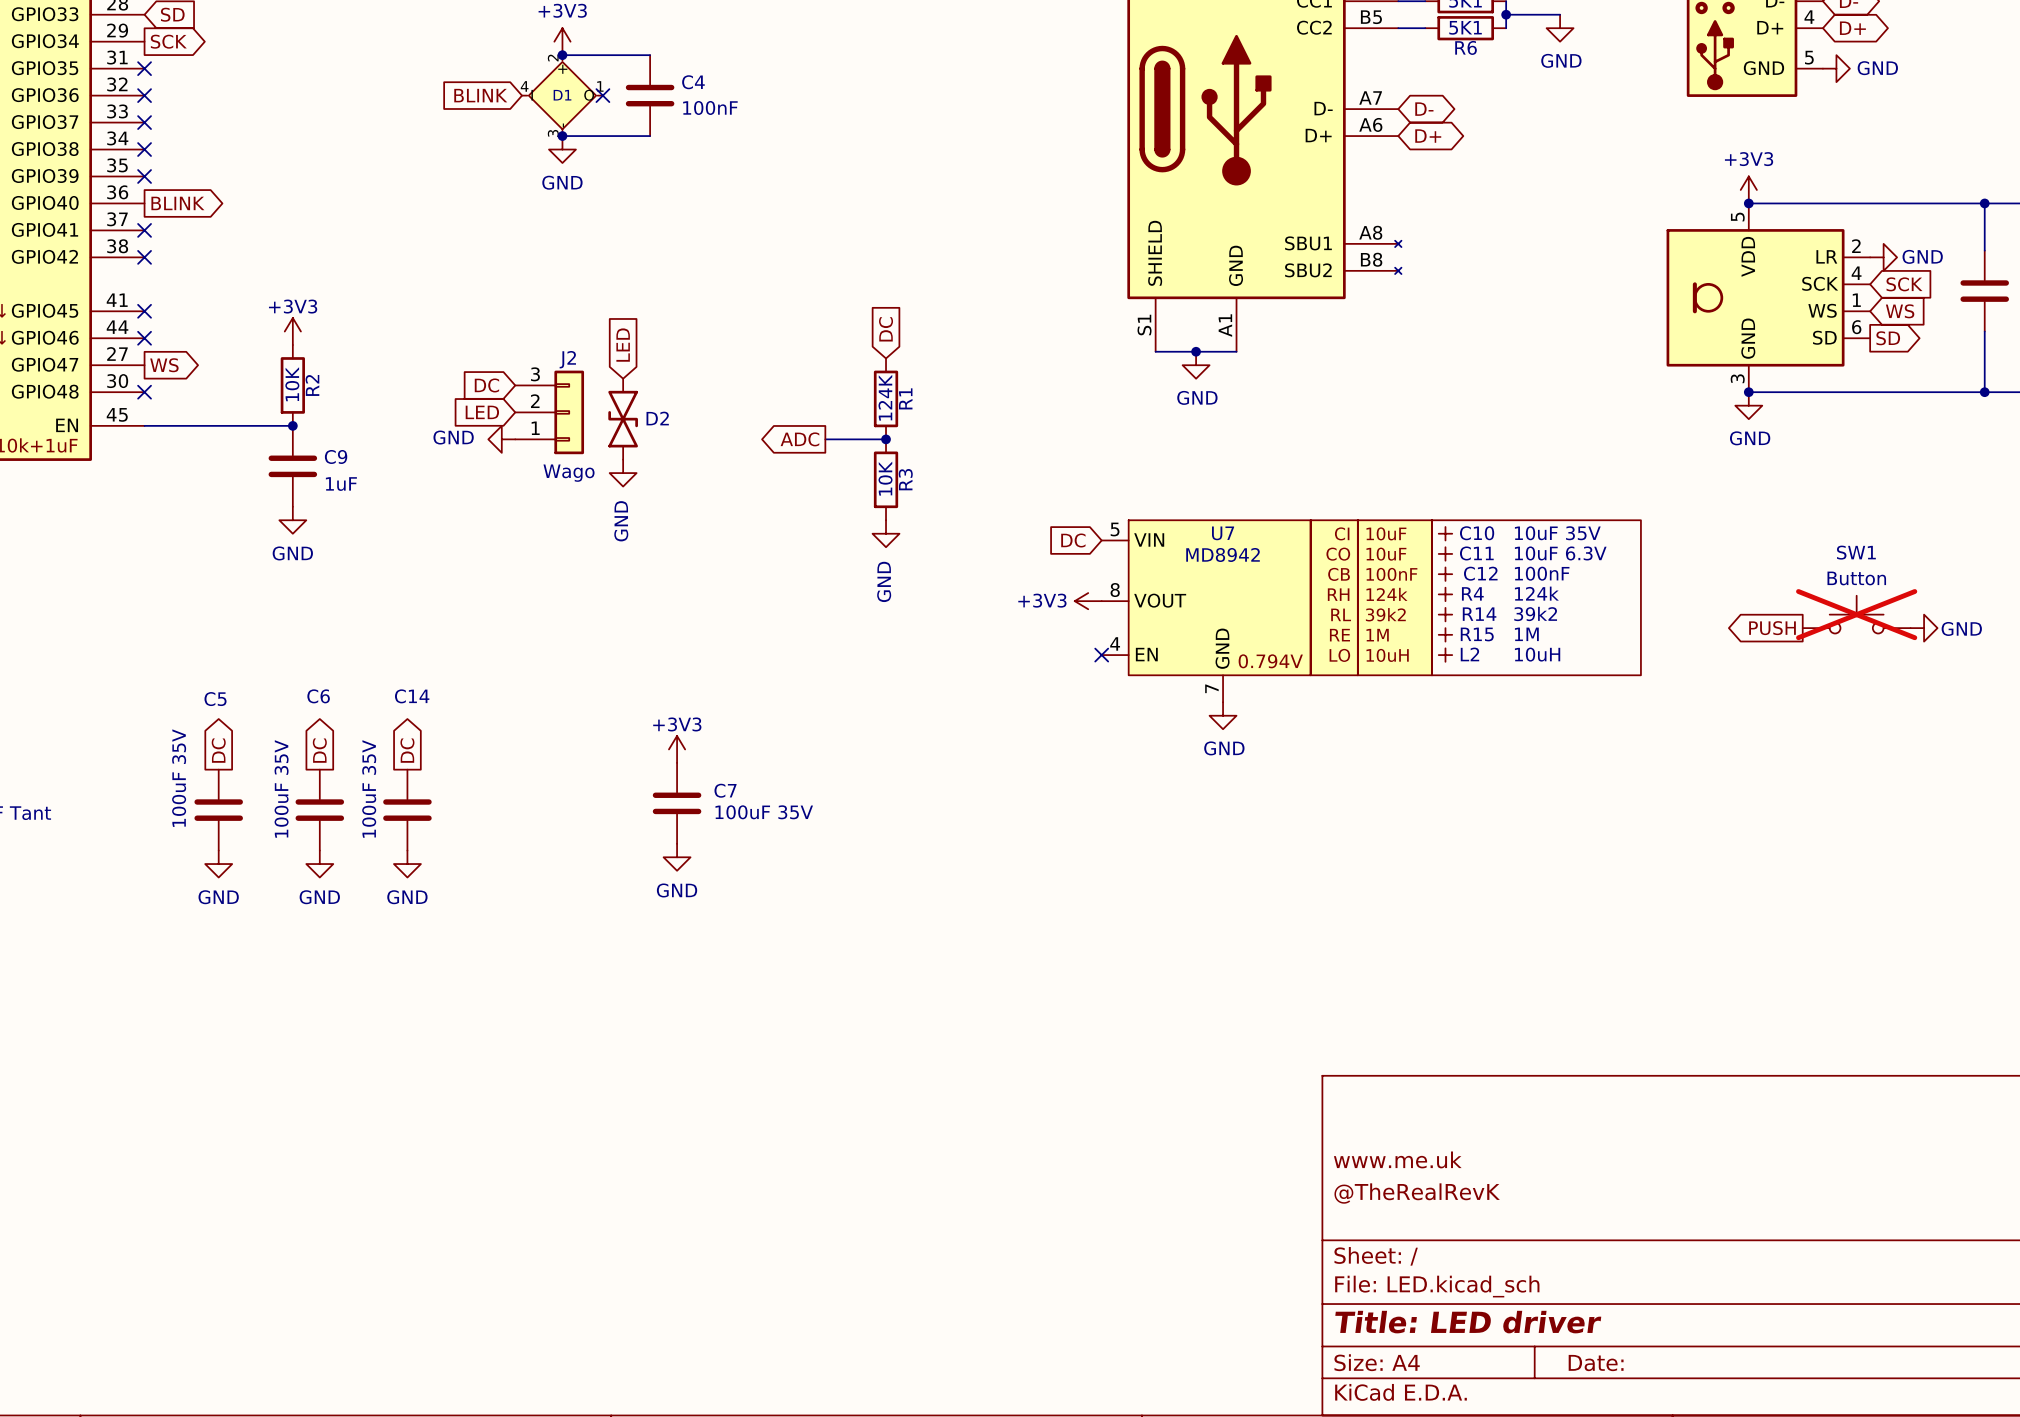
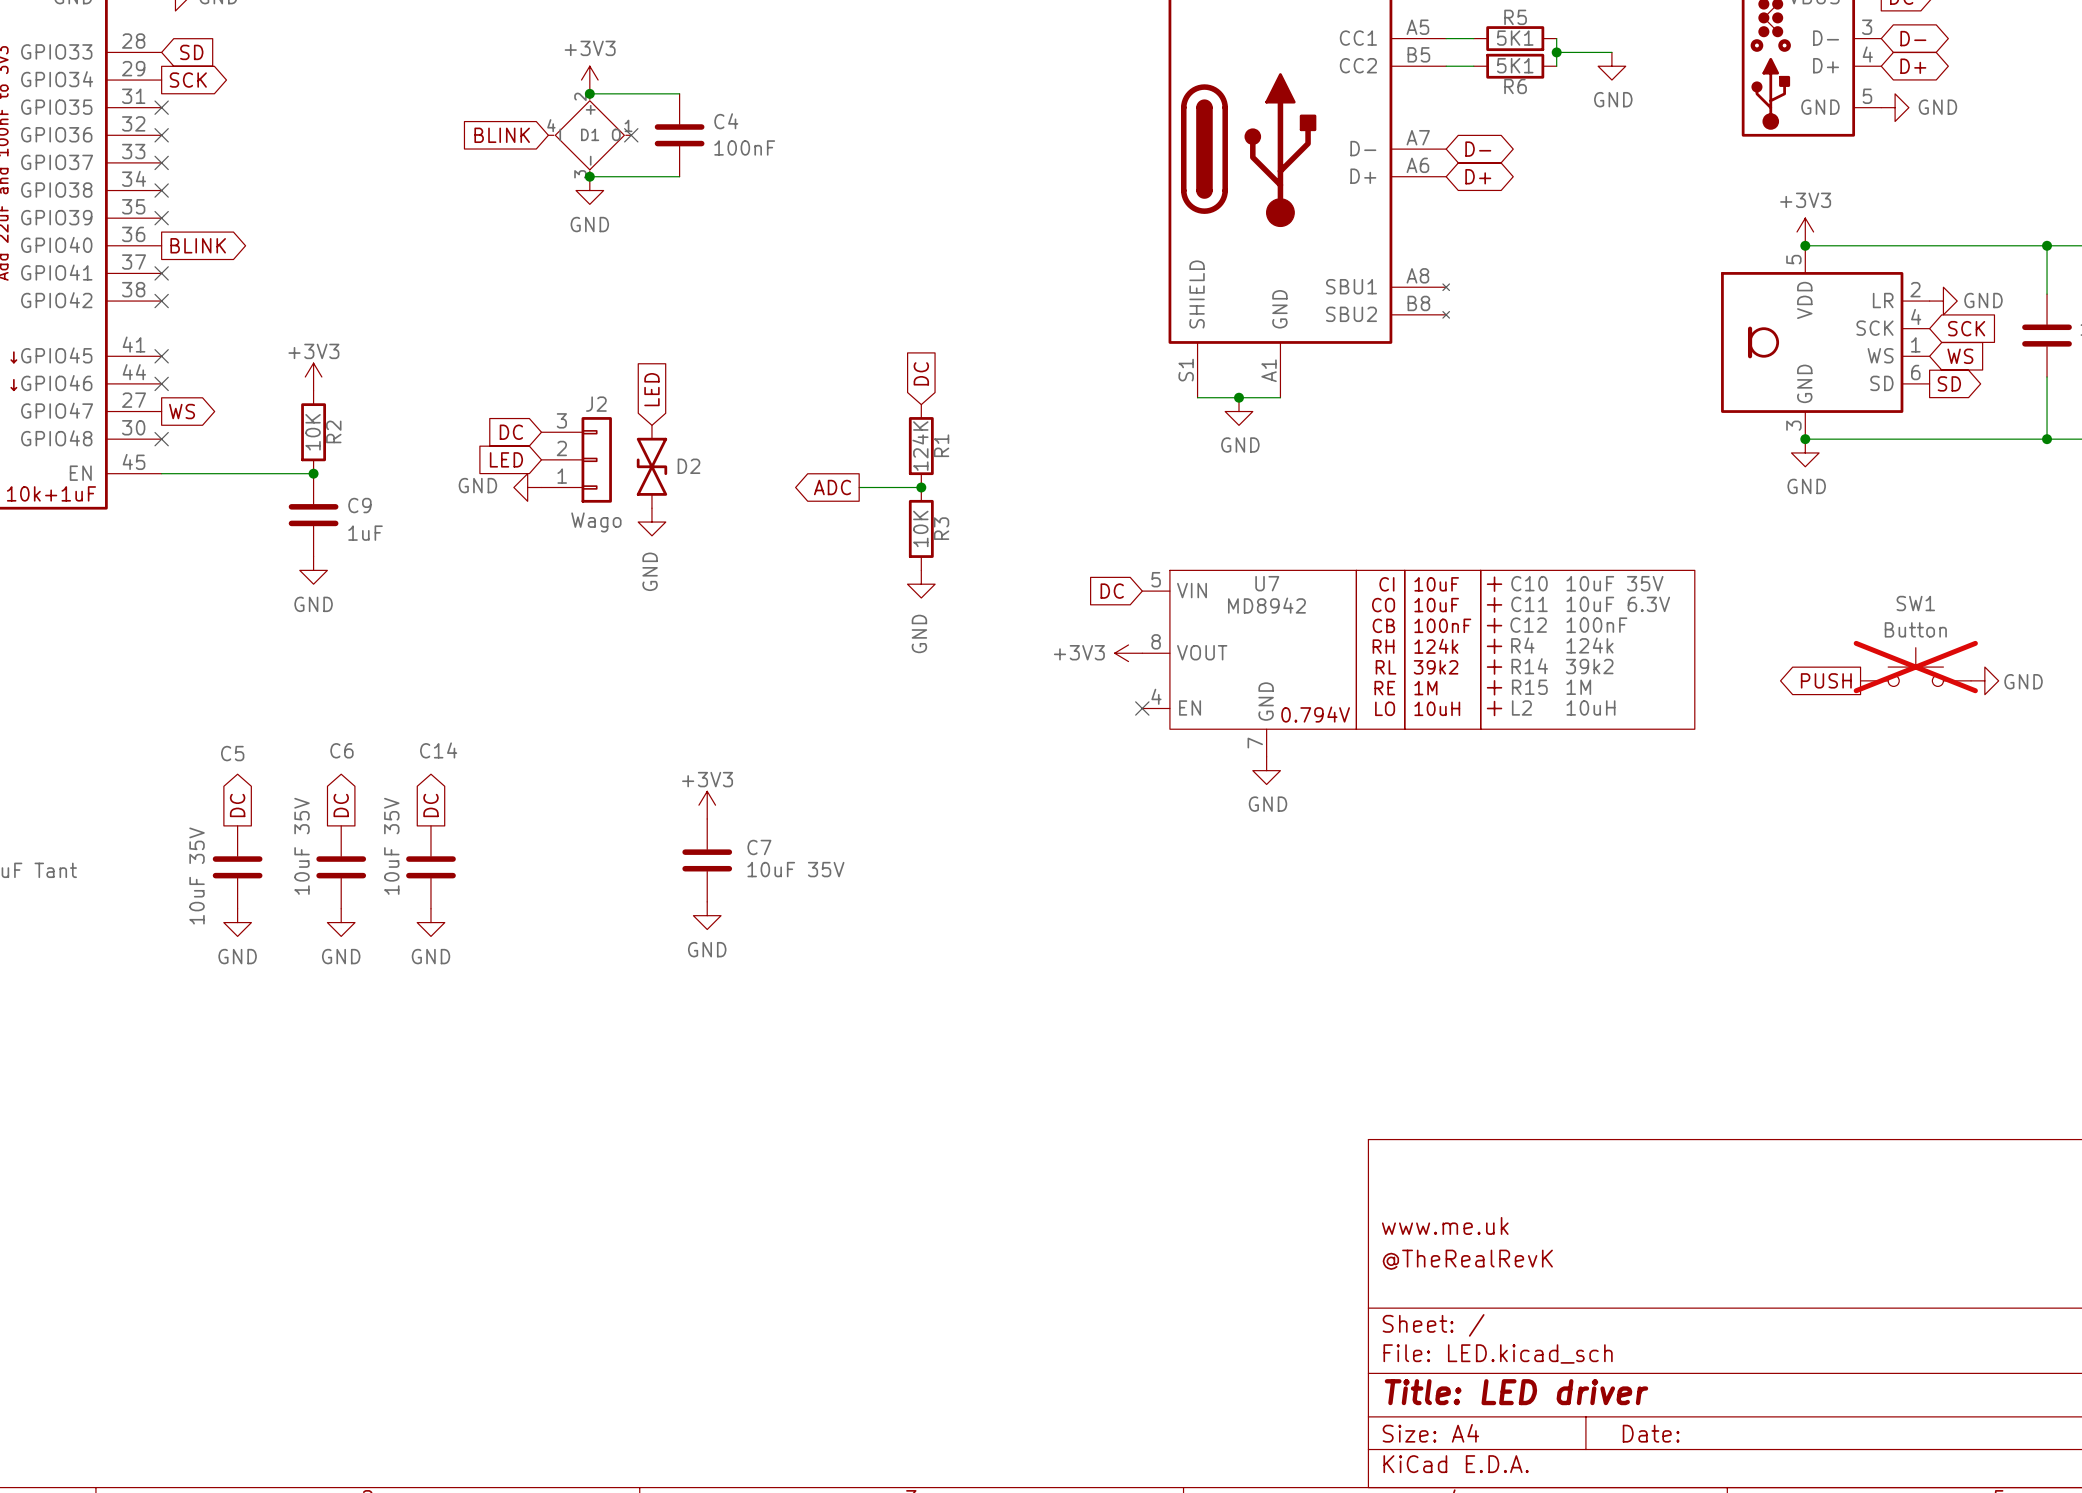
C5 value: 100uF 35V (179, 778) -> 10uF 35V (197, 875)
C6 value: 100uF 35V (281, 788) -> 10uF 35V (302, 846)
C14 value: 100uF 35V (369, 788) -> 10uF 35V (391, 846)
C7 value: 100uF 35V (764, 812) -> 10uF 35V (795, 869)

